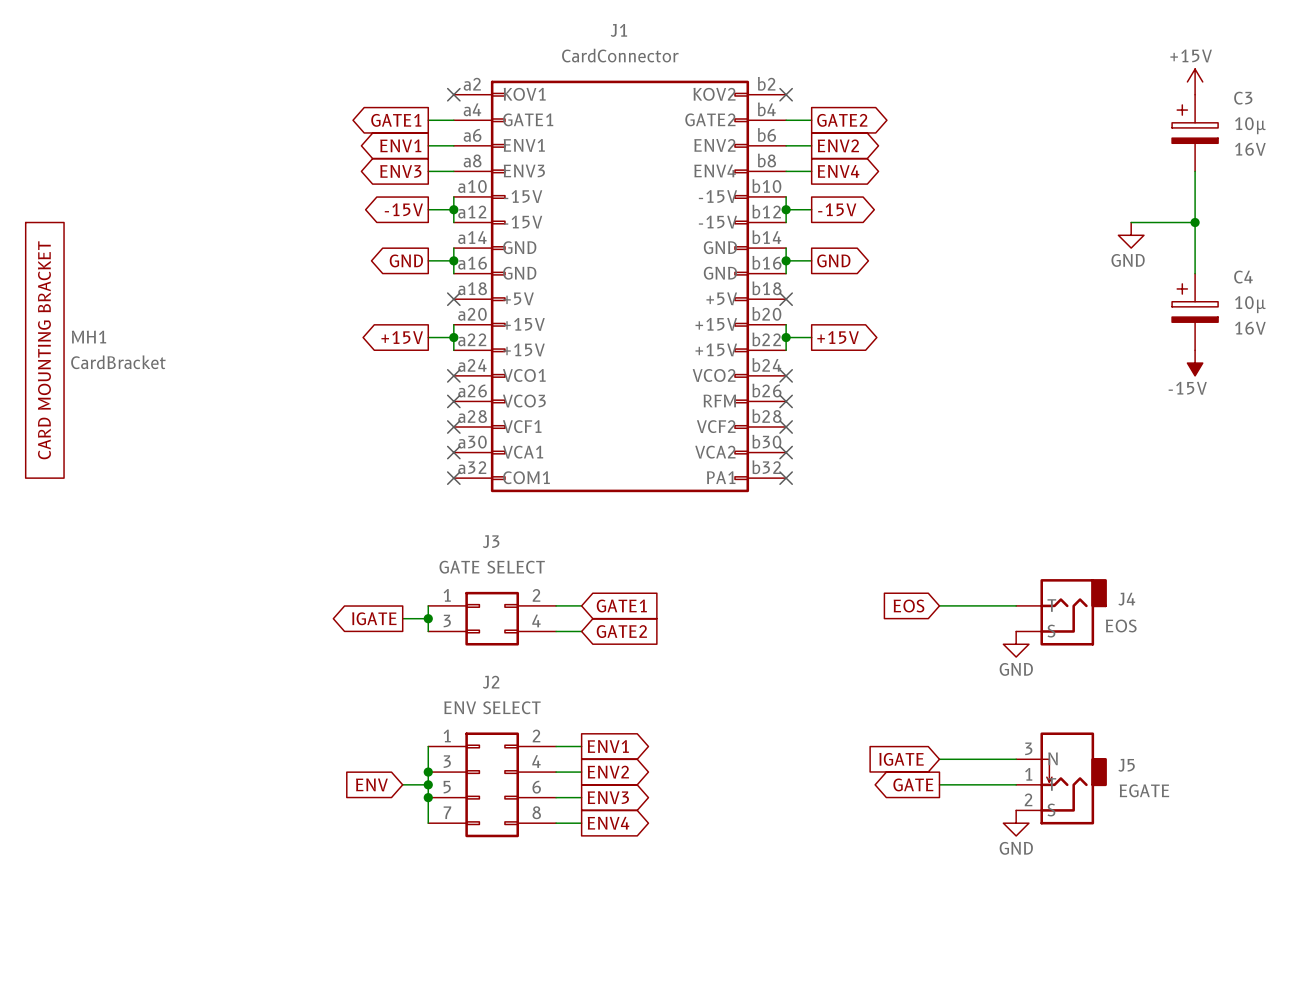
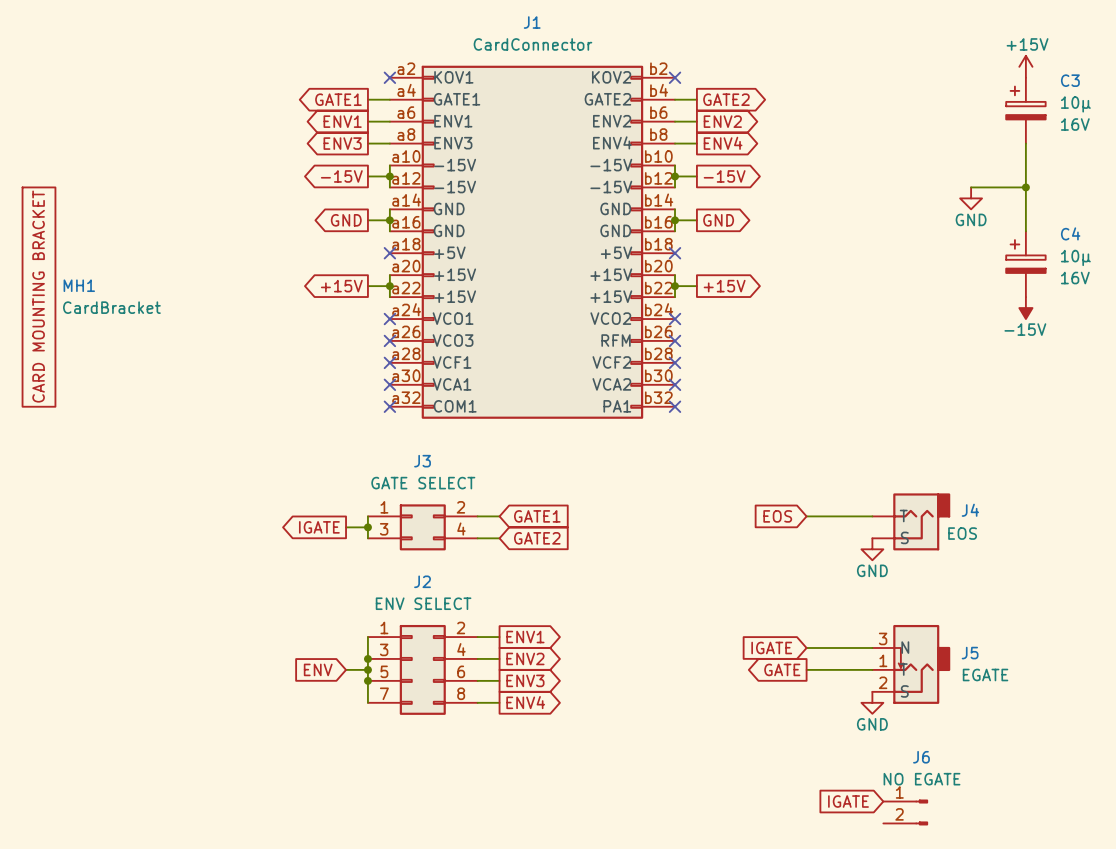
global label: none -> IGATE (848, 801)
J6: none -> NO EGATE (905, 812)

